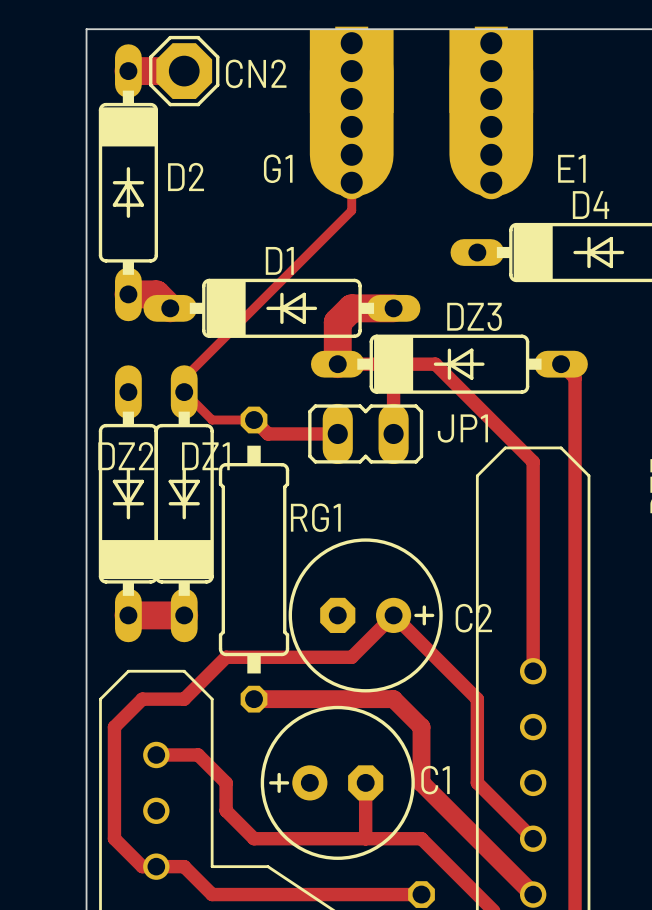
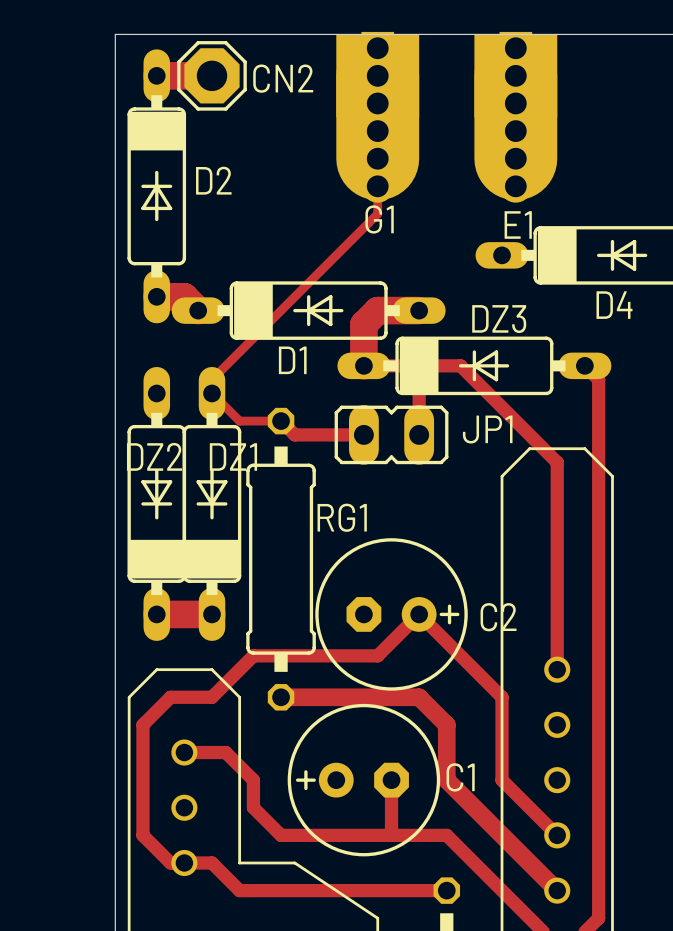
G1 name position: G1 (278, 168) -> G1 (379, 219)
E1 name position: E1 (571, 168) -> E1 (518, 224)
D4 name position: D4 (591, 205) -> D4 (614, 305)
D1 name position: D1 (279, 260) -> D1 (292, 360)

